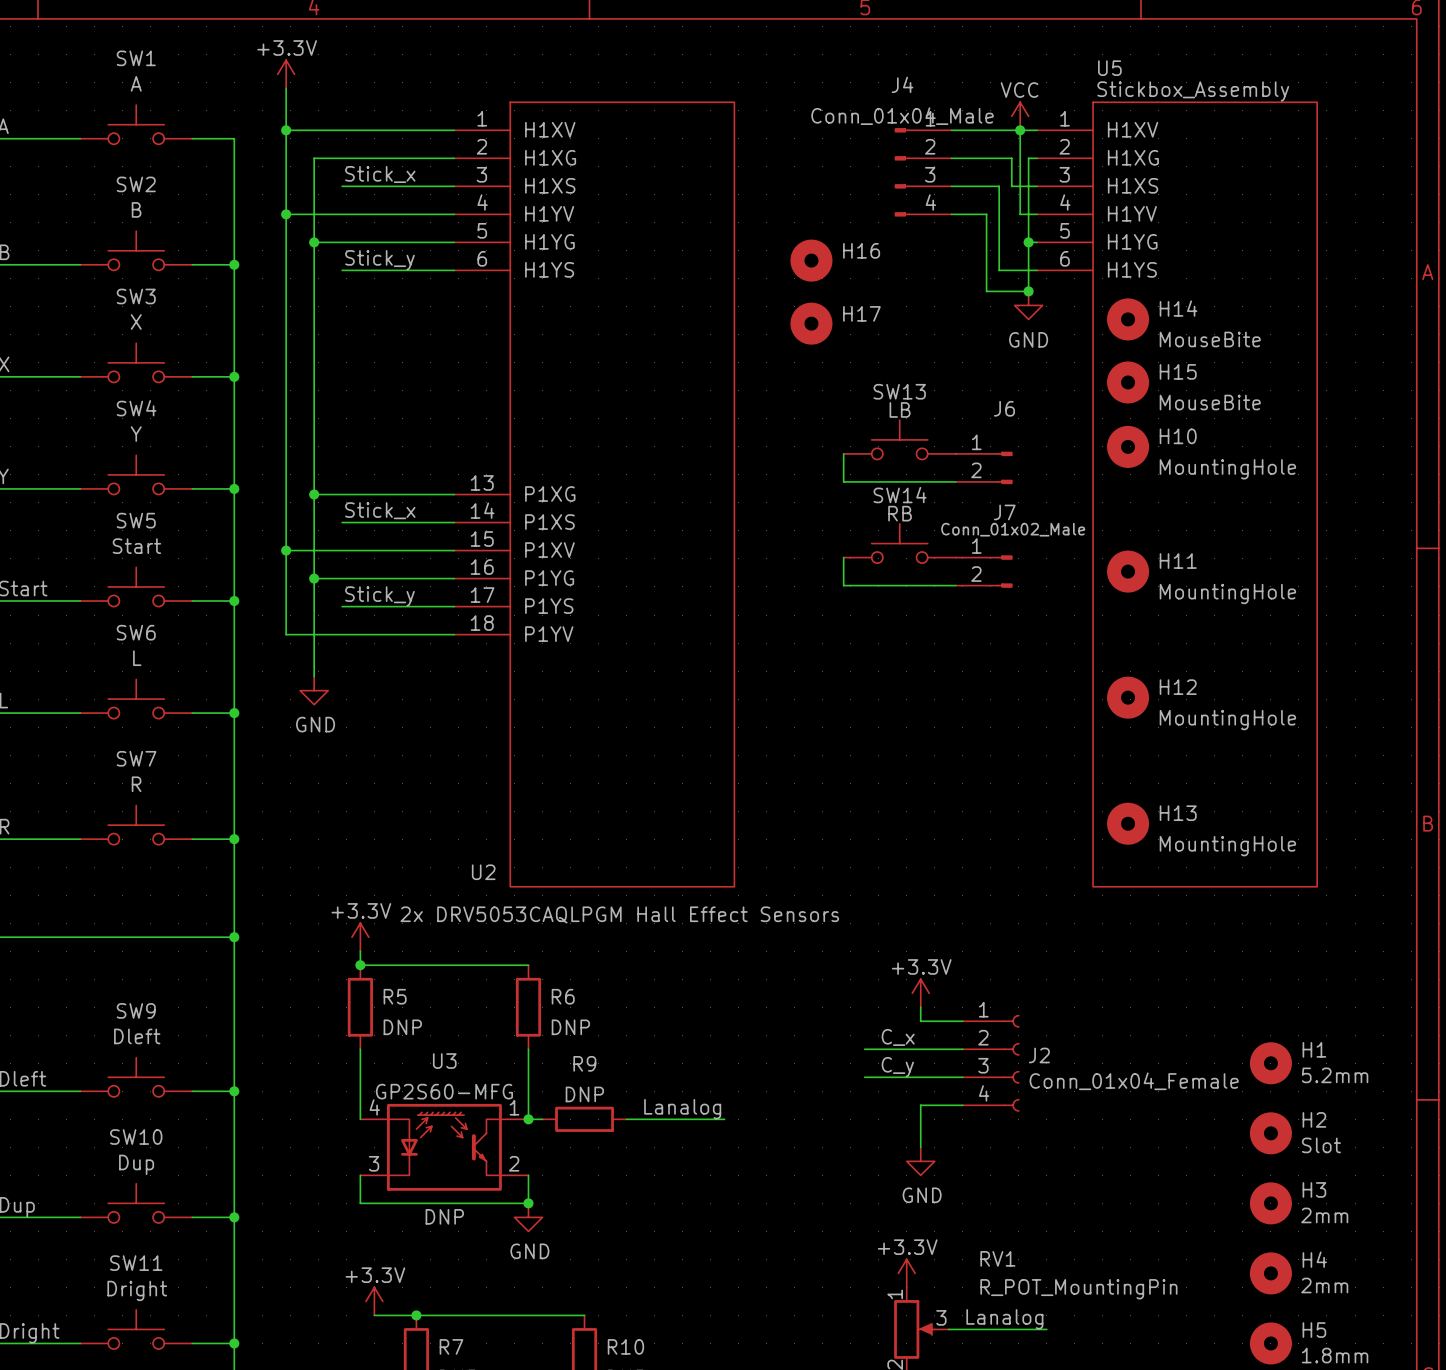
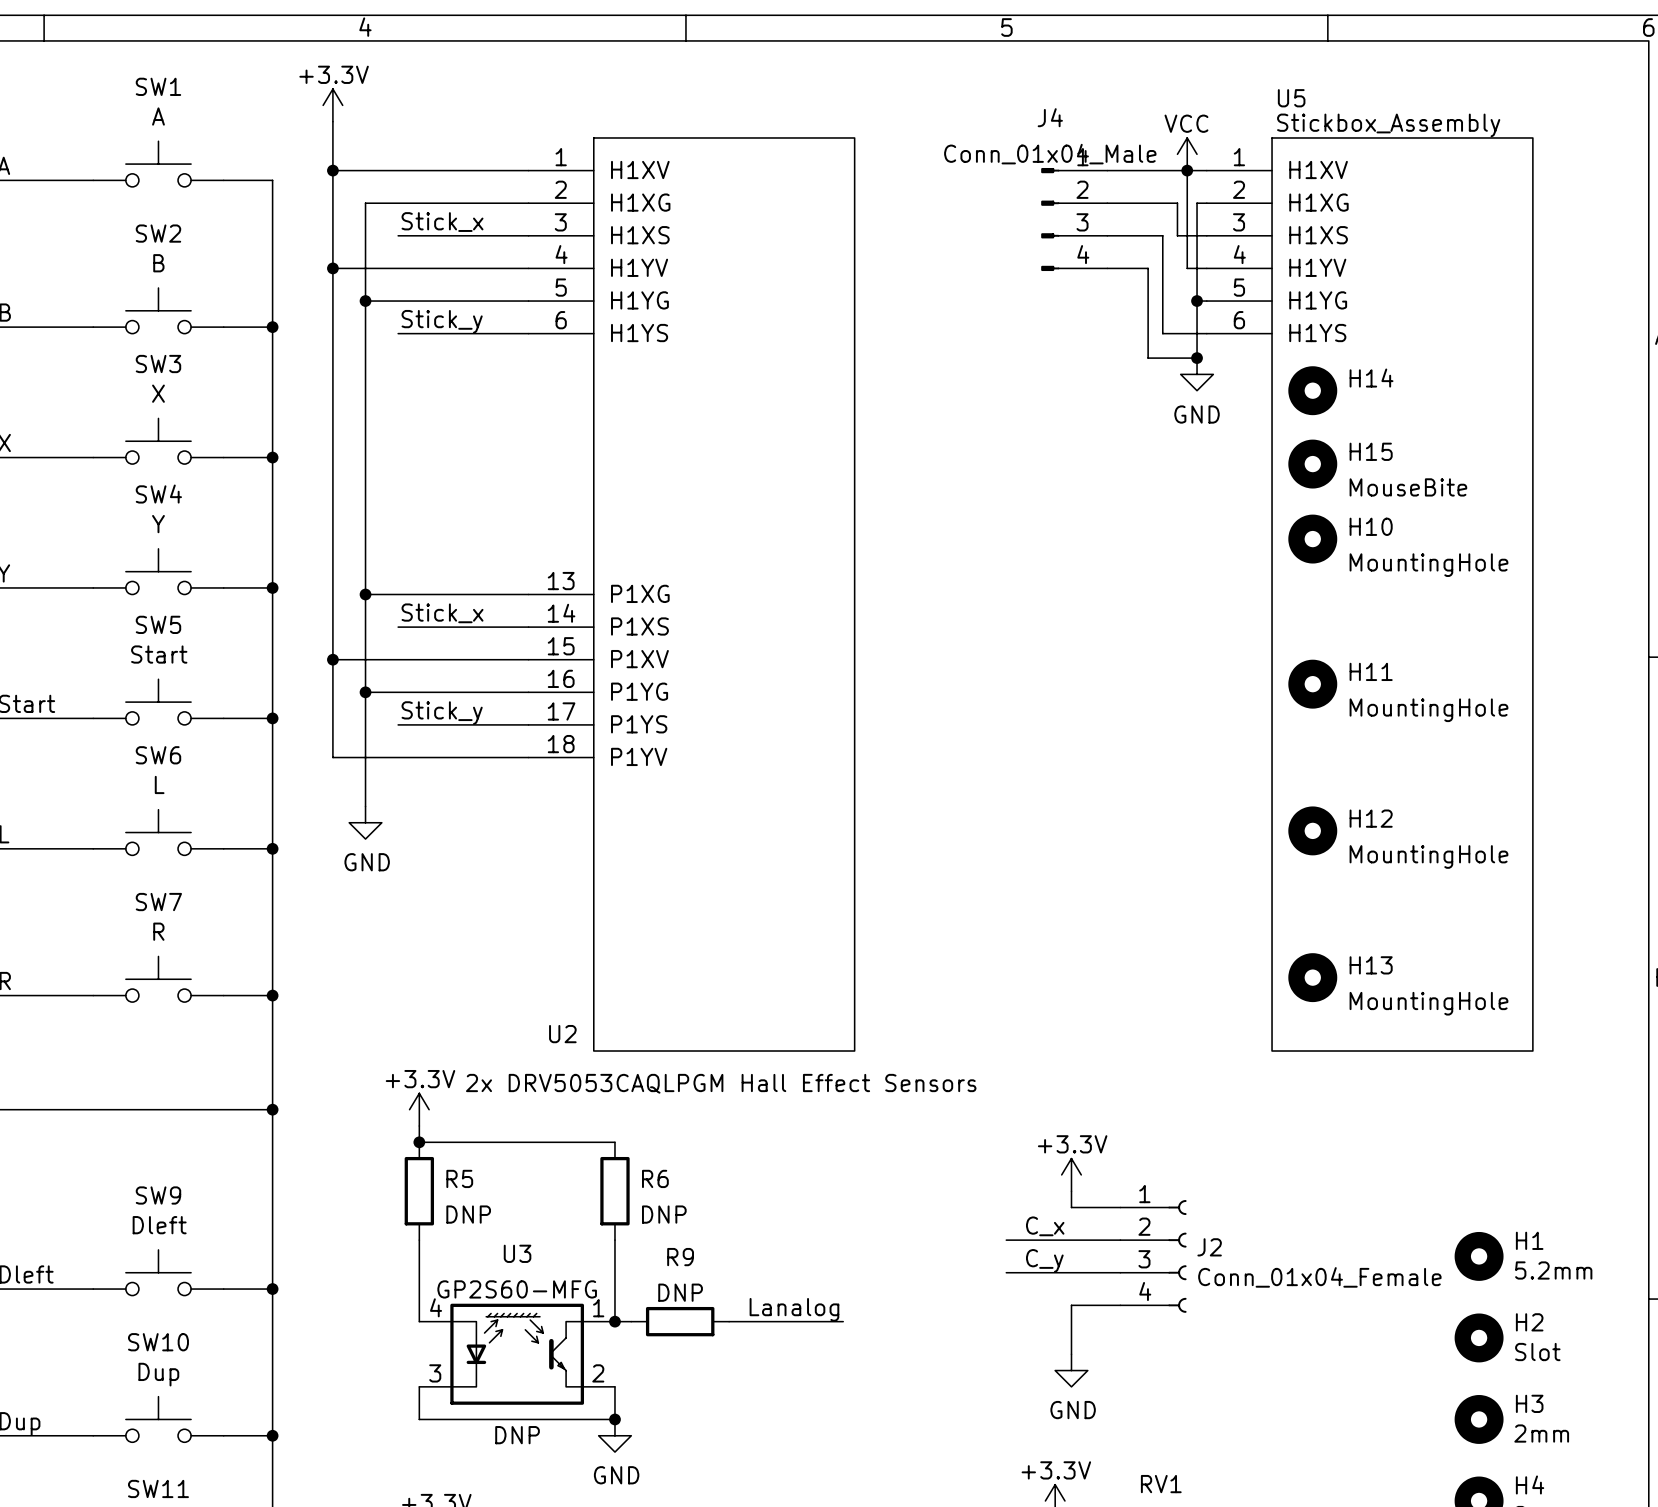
H16: (811, 260) -> none
H17: (811, 323) -> none
H14 value: MouseBite (1210, 339) -> none
SW13: LB (899, 439) -> none
wire: (843, 453) (843, 481) (955, 481) -> none
J6: (984, 467) -> none
SW14: RB (899, 543) -> none
wire: (843, 557) (843, 585) (955, 585) -> none
J7: Conn_01x02_Male (984, 571) -> none

